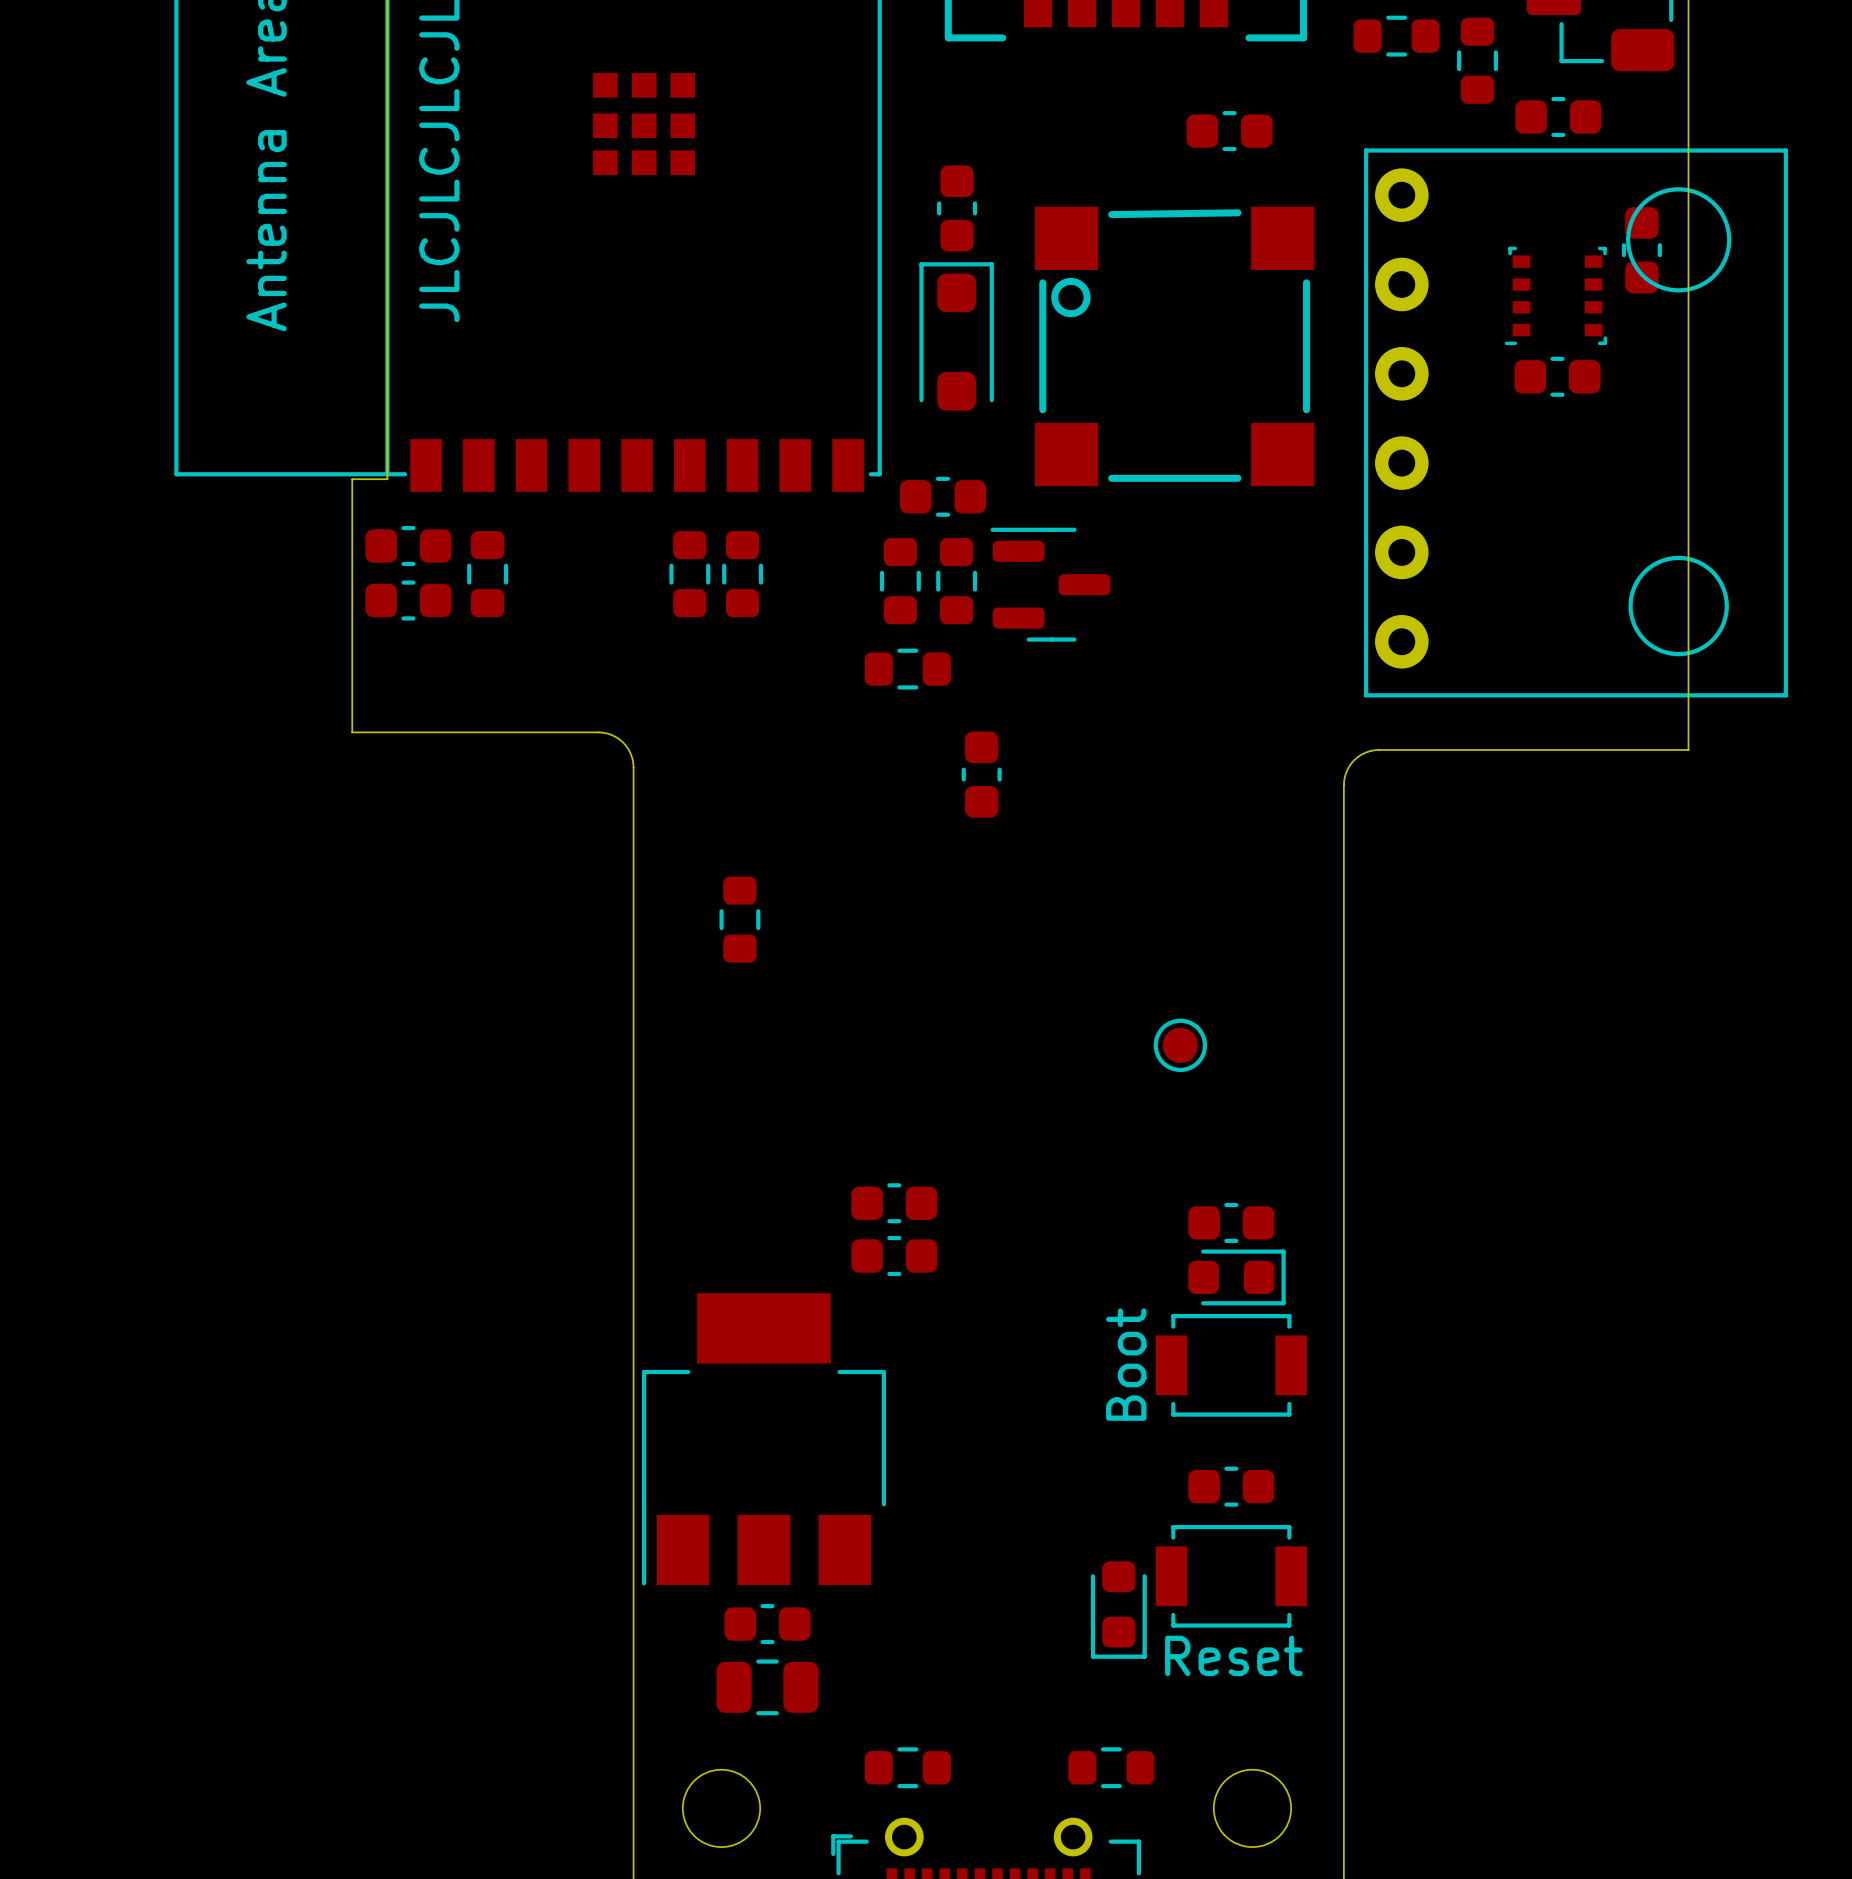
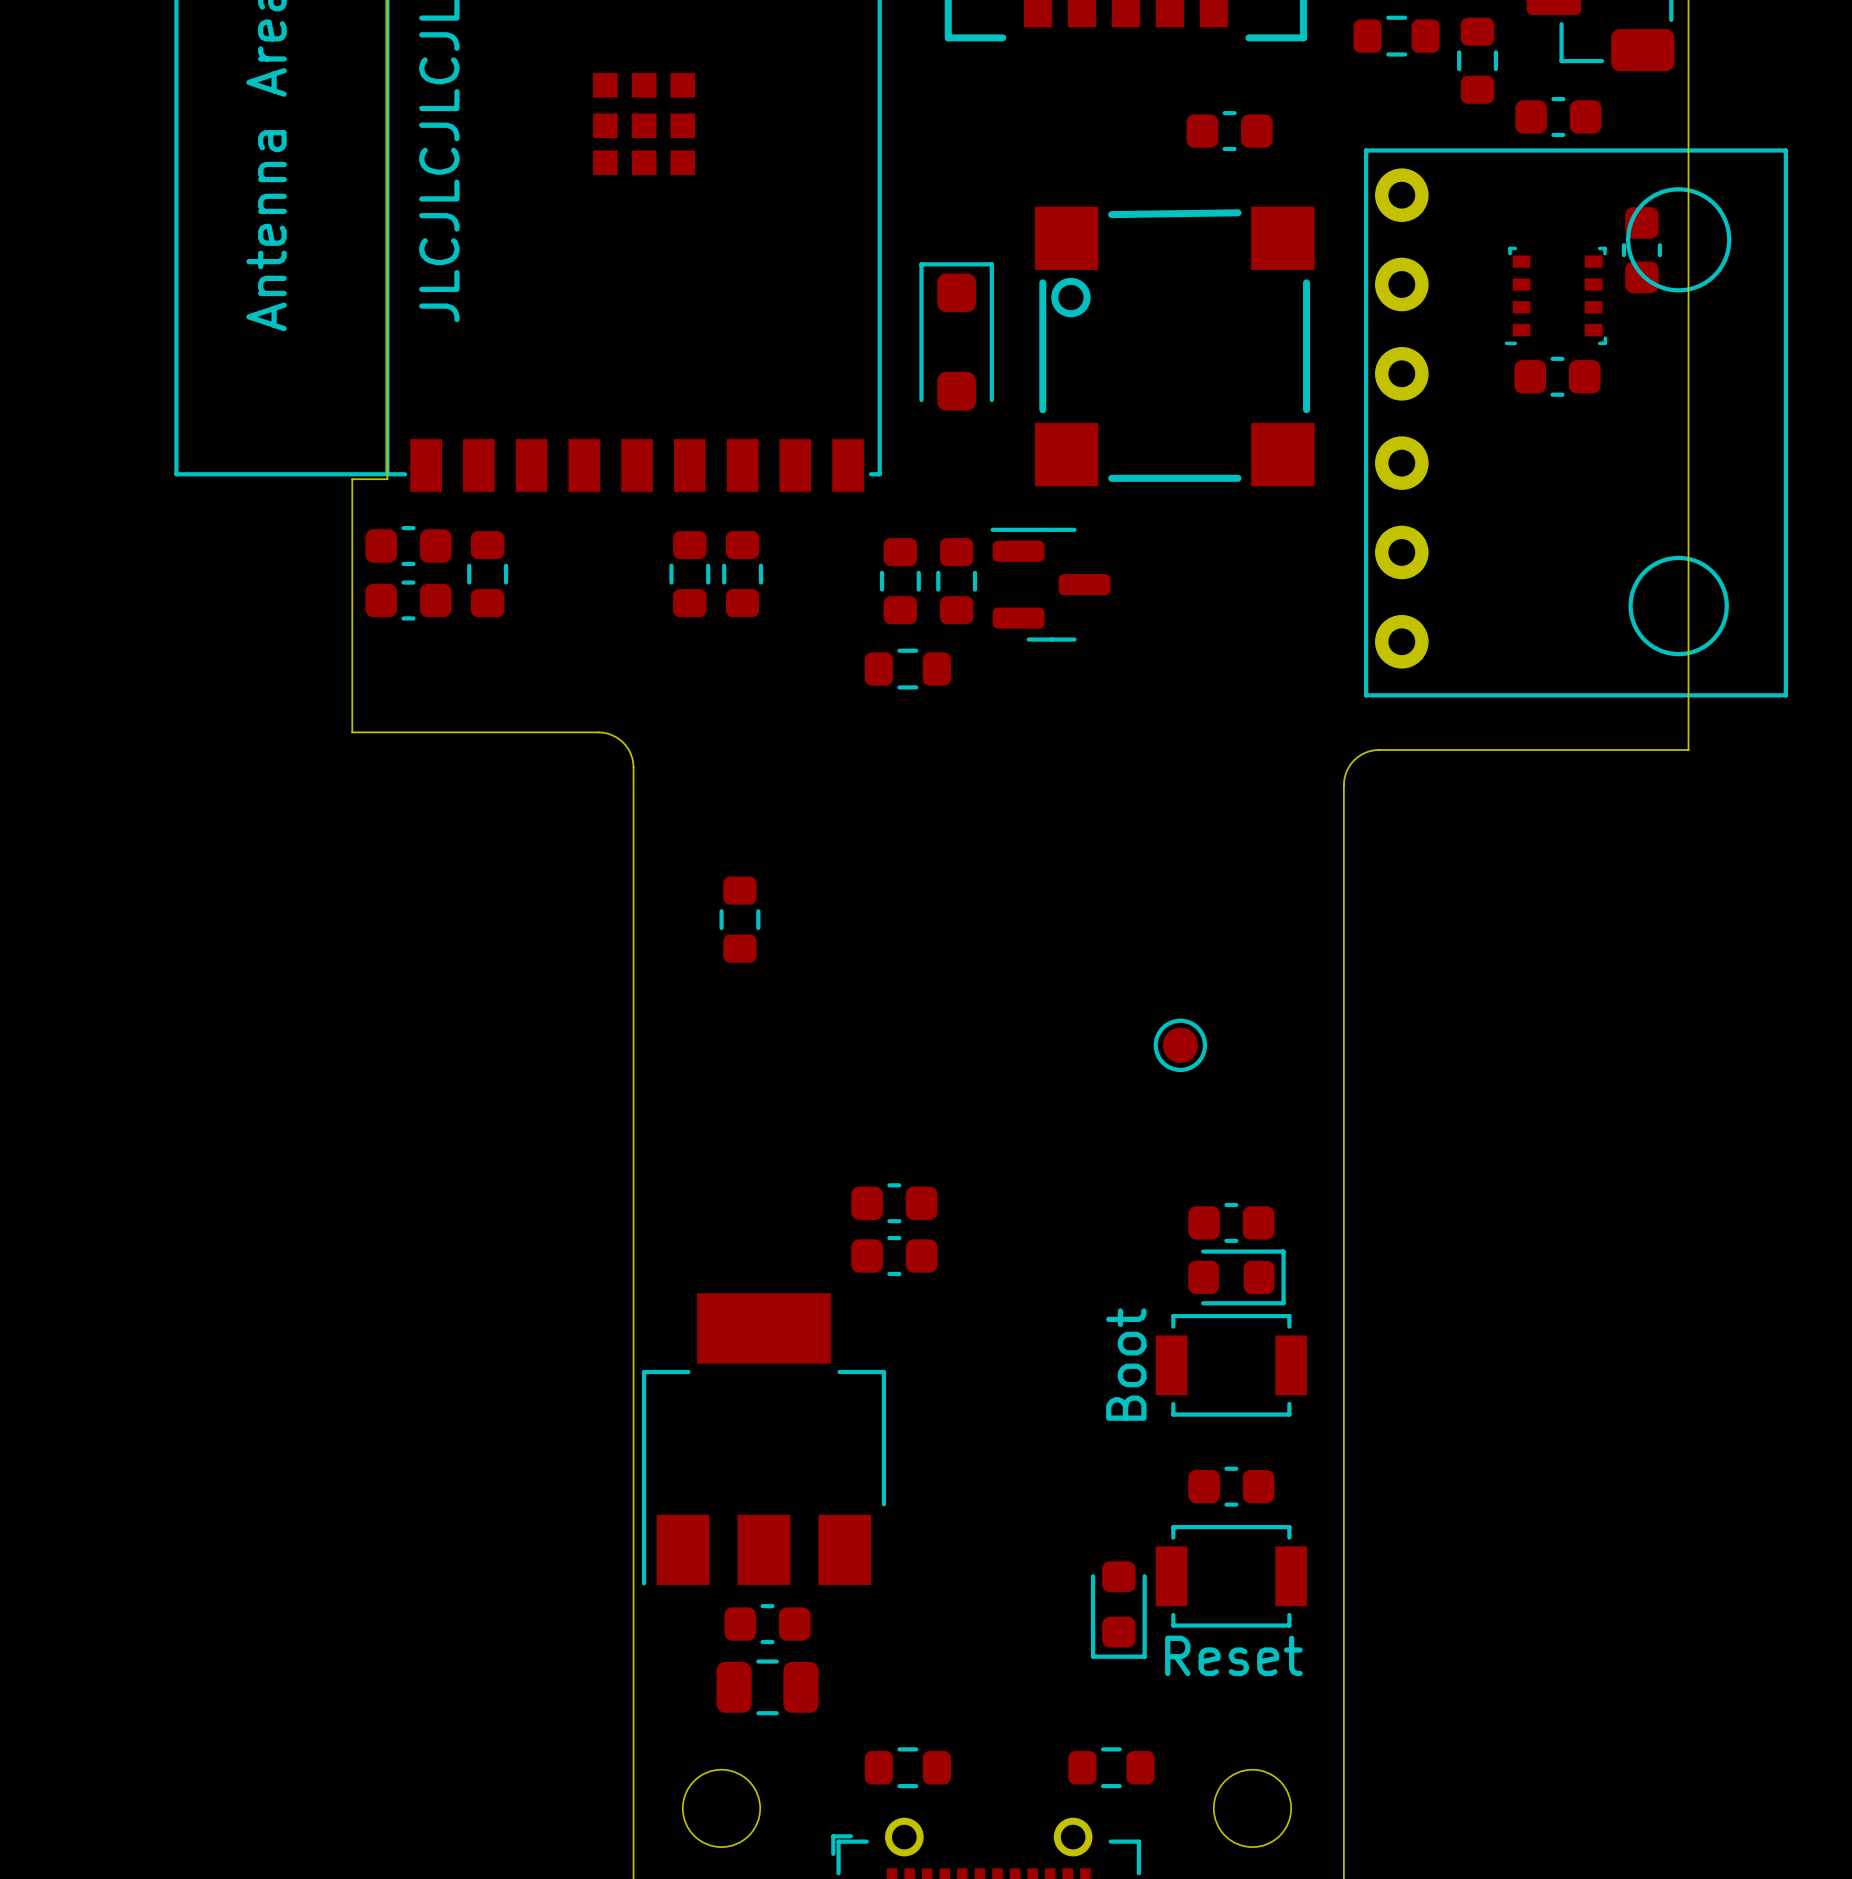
part: (957, 208) -> none
part: (943, 496) -> none
part: (981, 774) -> none

